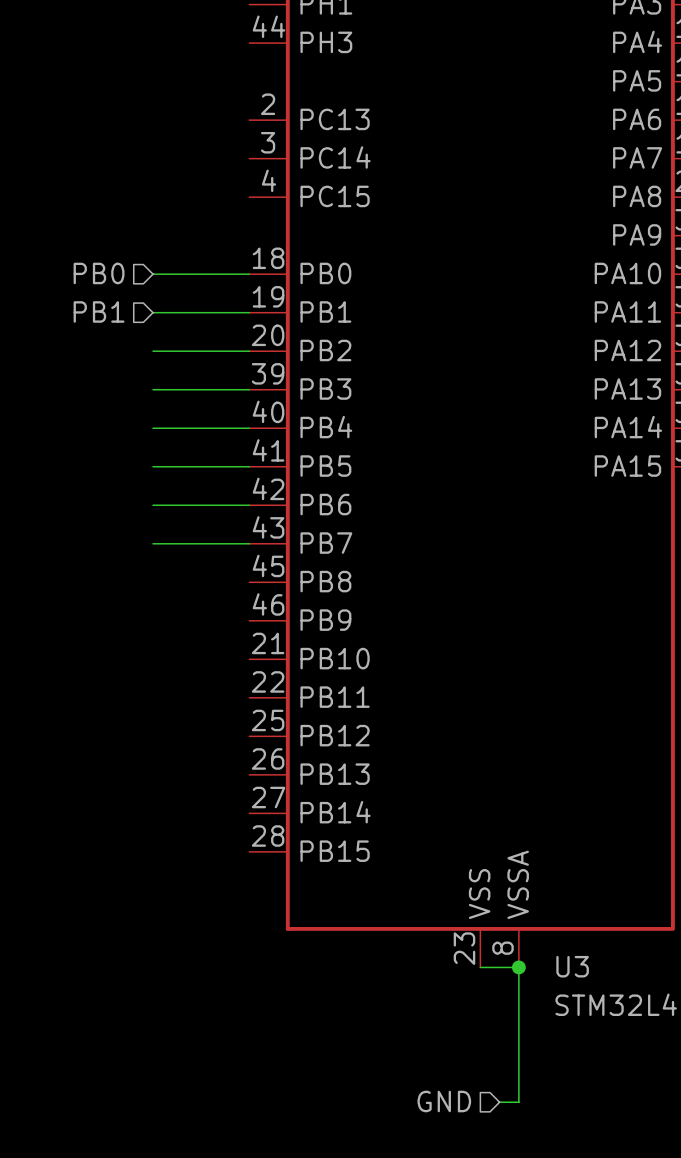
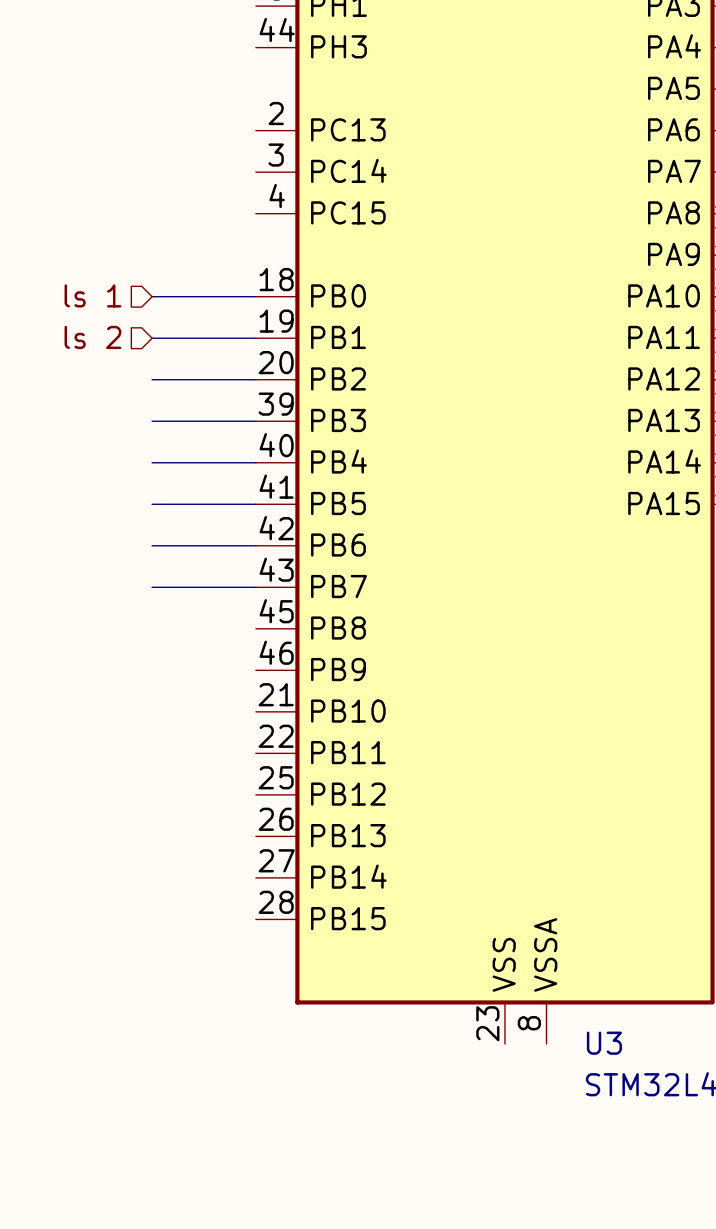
hierarchical label: PB0 (99, 273) -> ls 1 (92, 295)
hierarchical label: PB1 (99, 311) -> ls 2 (92, 337)
wire: (480, 967) (518, 967) (518, 1102) (499, 1102) -> none
junction: (518, 967) -> none
hierarchical label: GND (444, 1101) -> none

